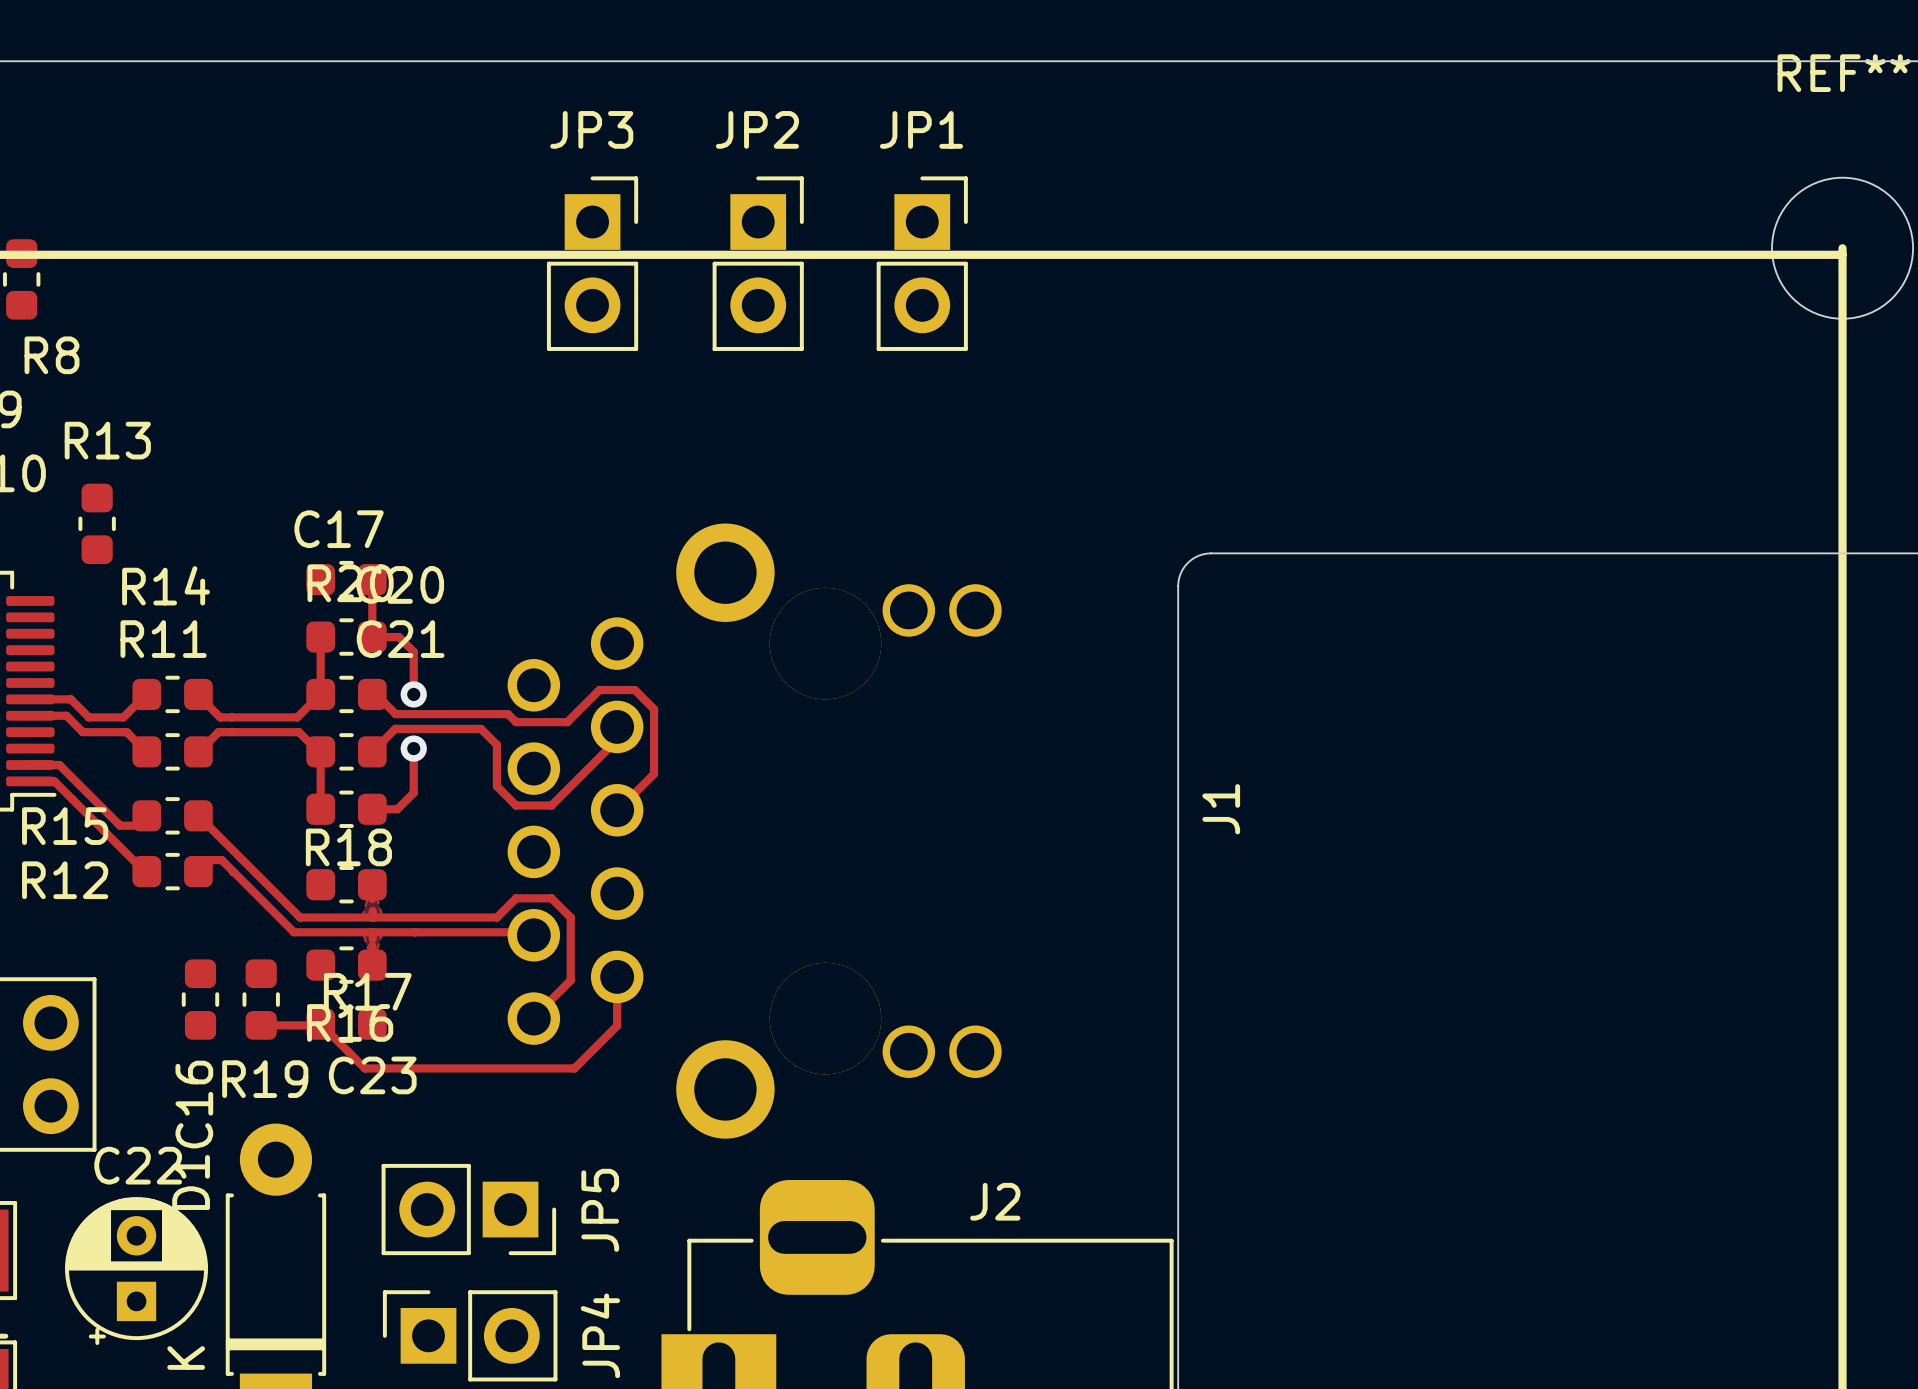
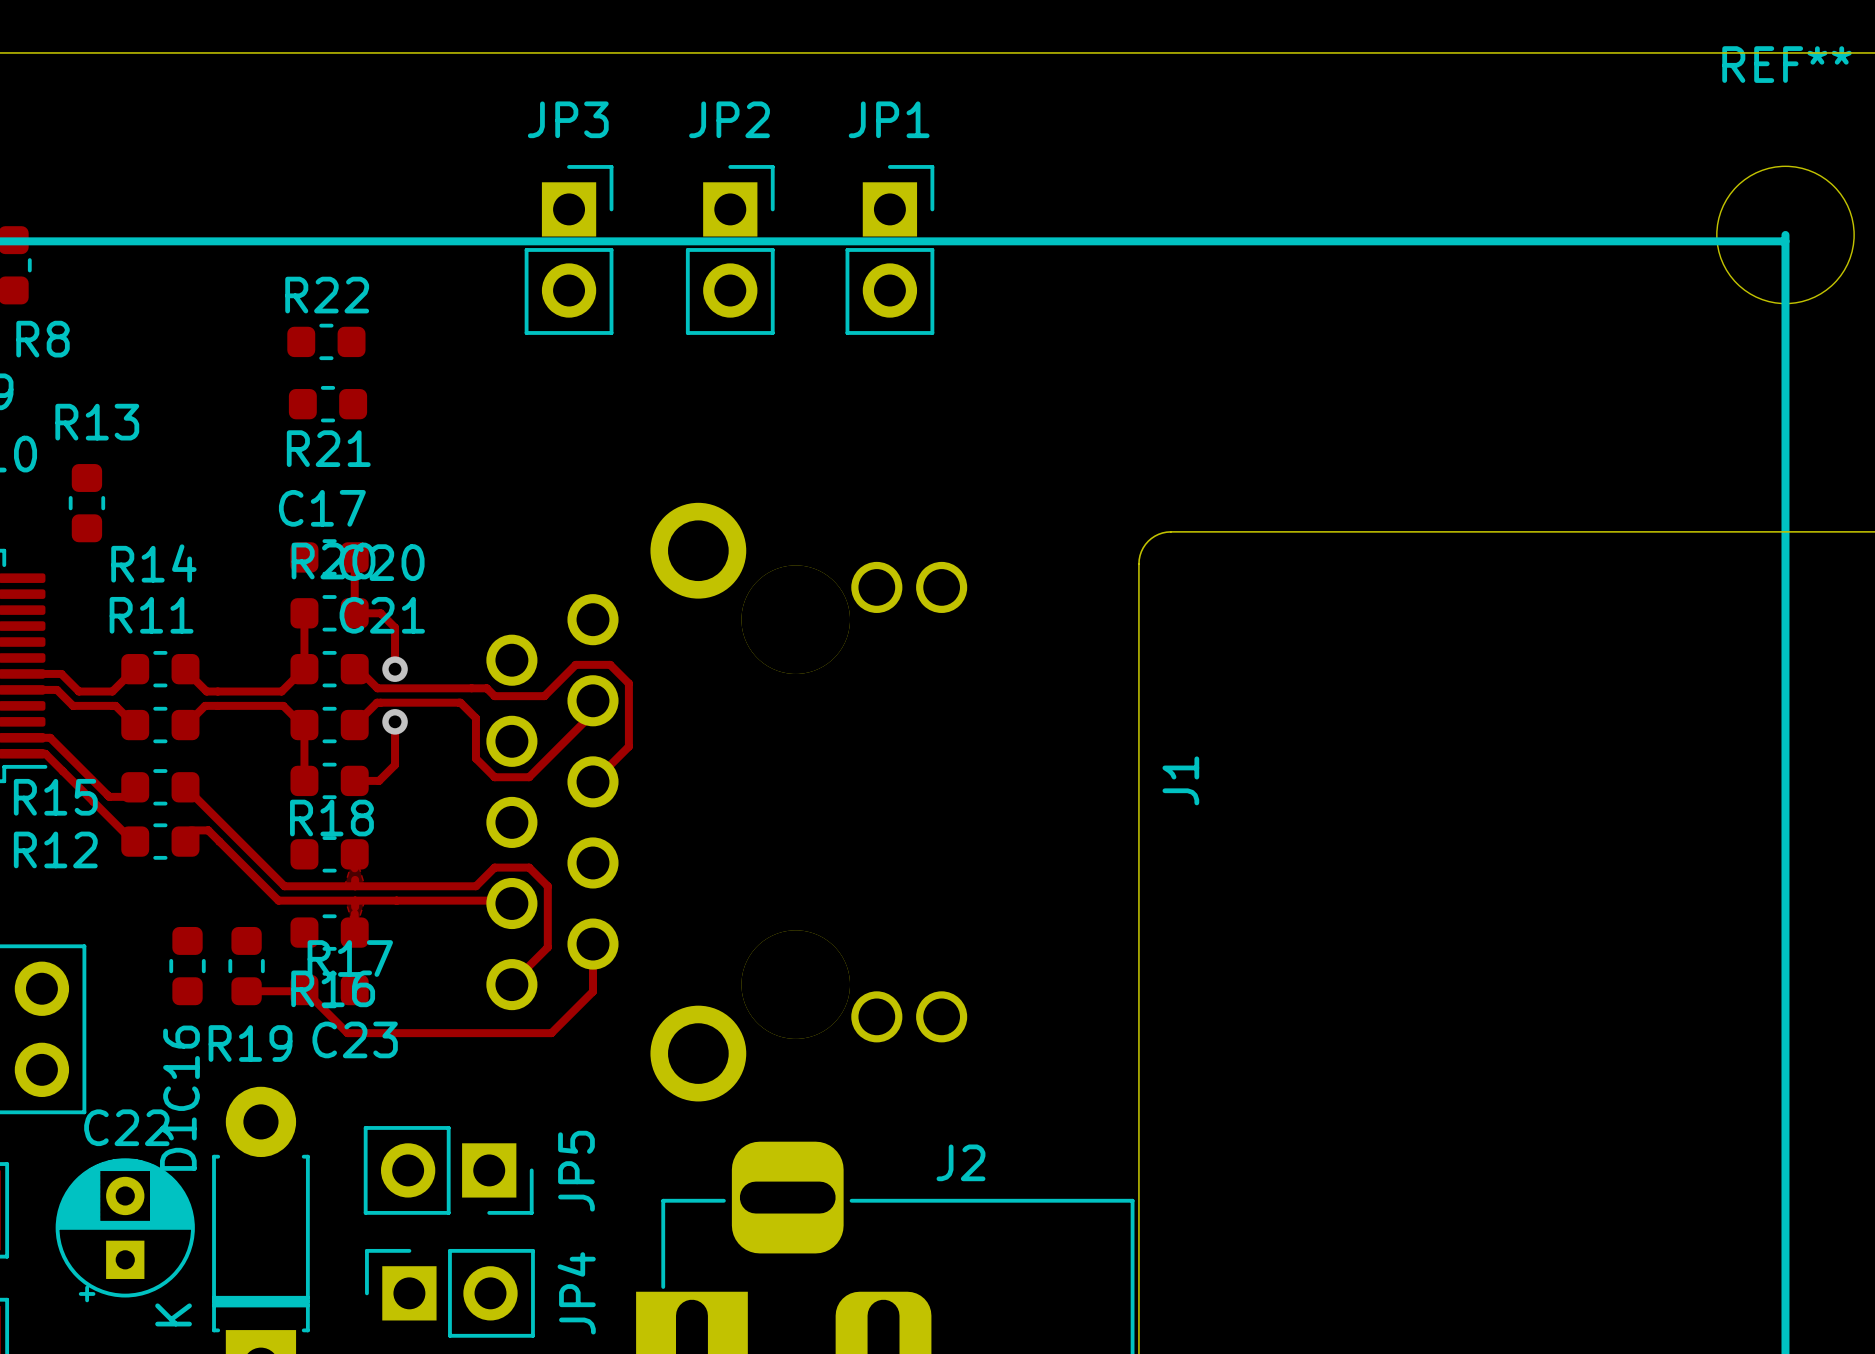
R22: none -> (326, 341)
R21: none -> (328, 404)

